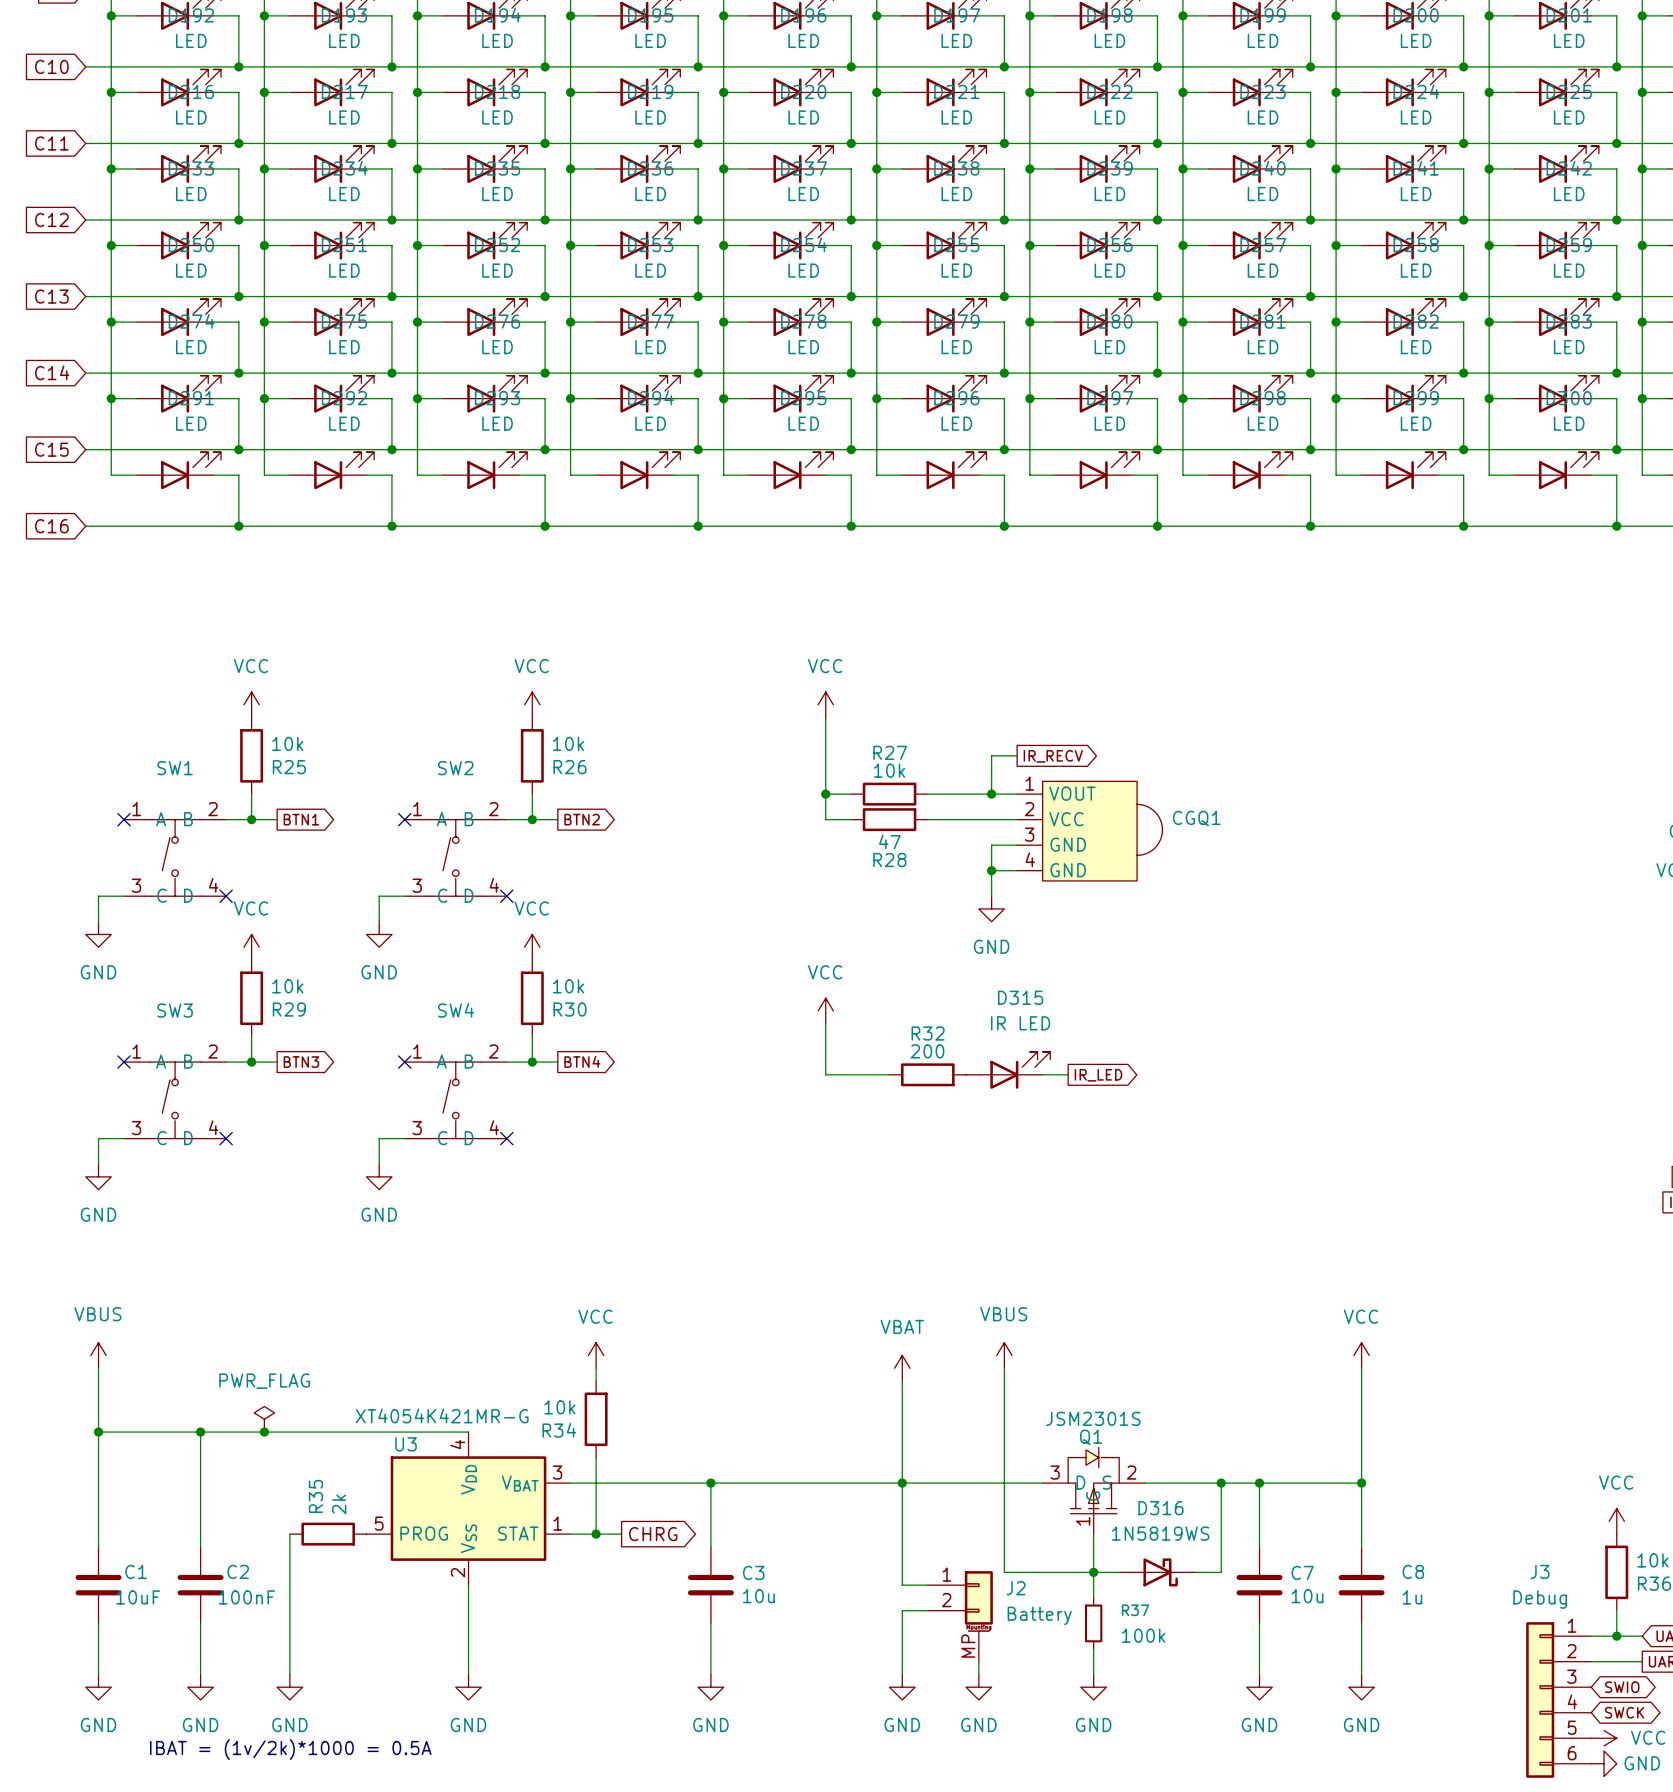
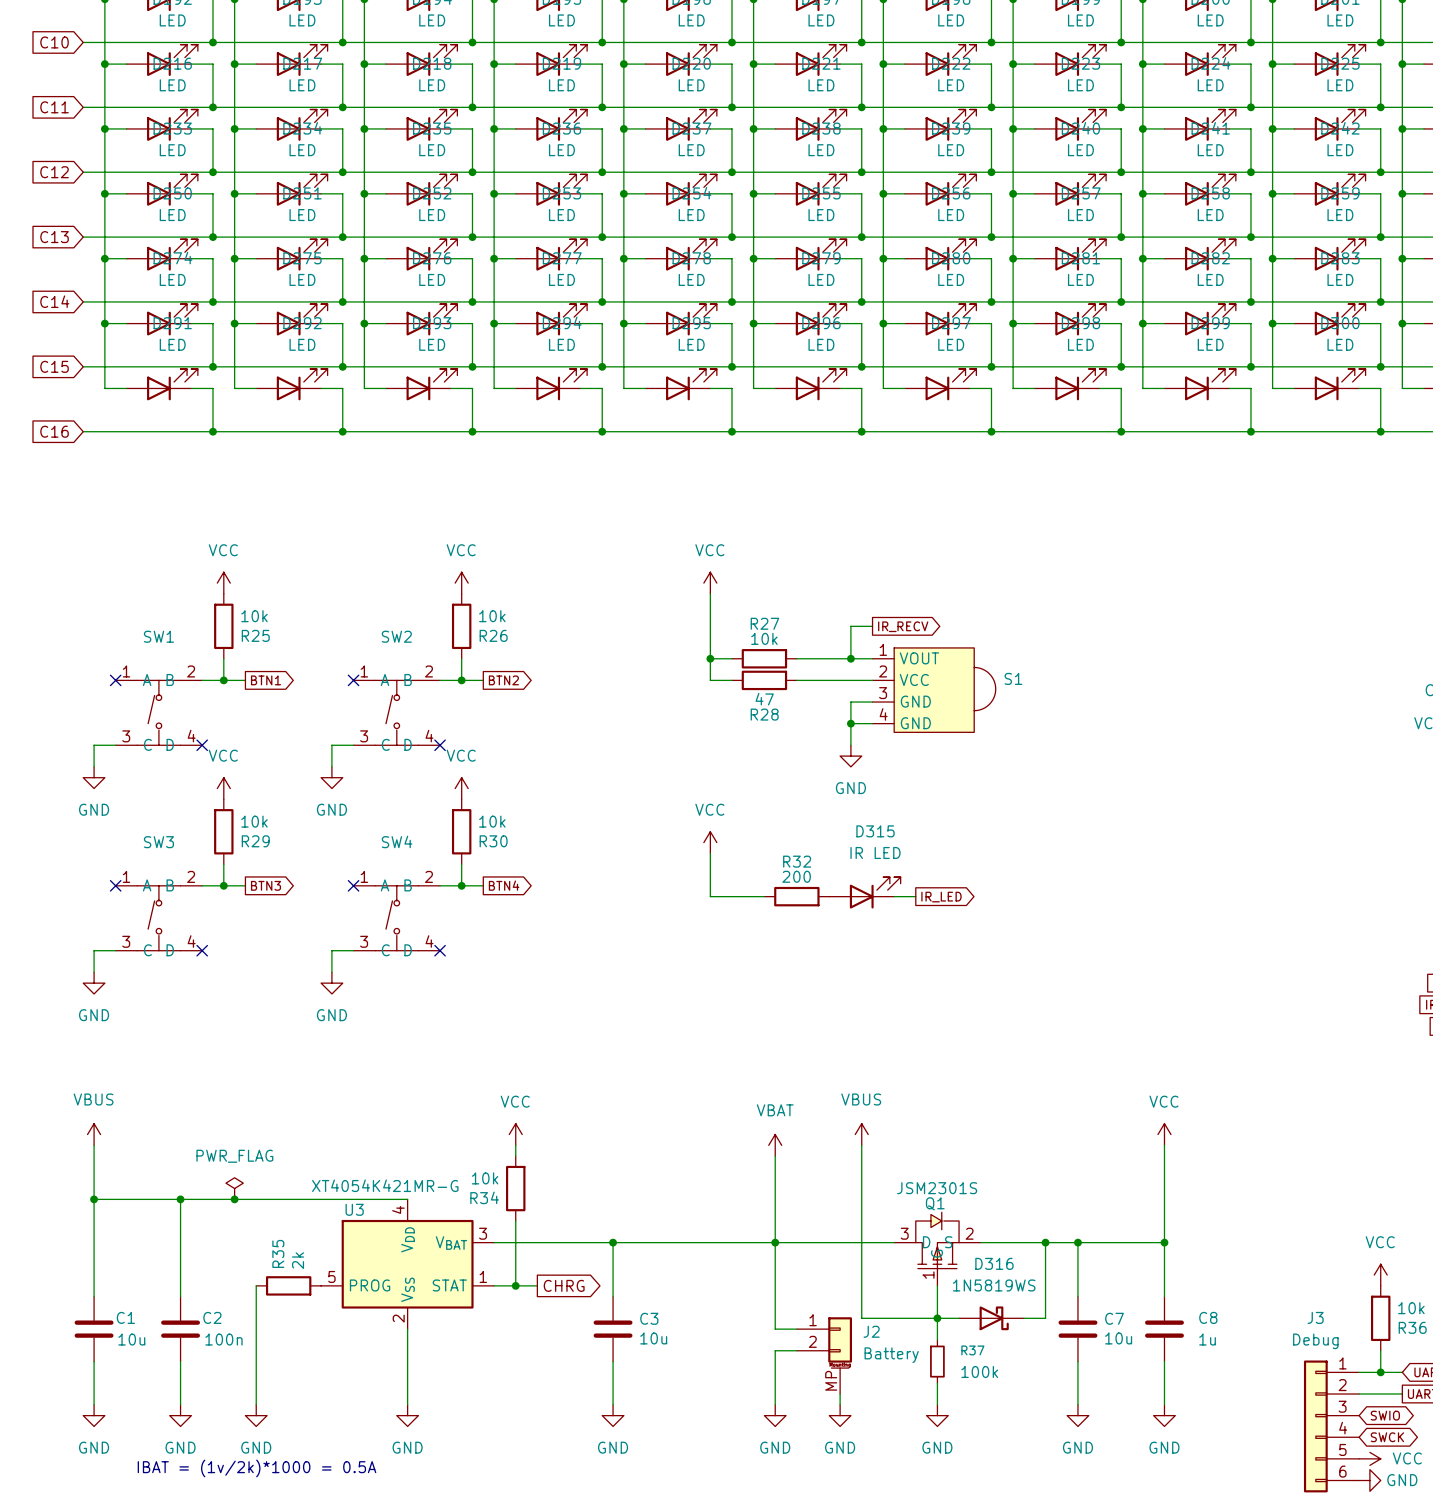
CGQ1 name: CGQ1 (1196, 818) -> S1 (1013, 678)
C1 value: 10uF (138, 1597) -> 10u (131, 1339)
C2 value: 100nF (246, 1597) -> 100n (223, 1339)

